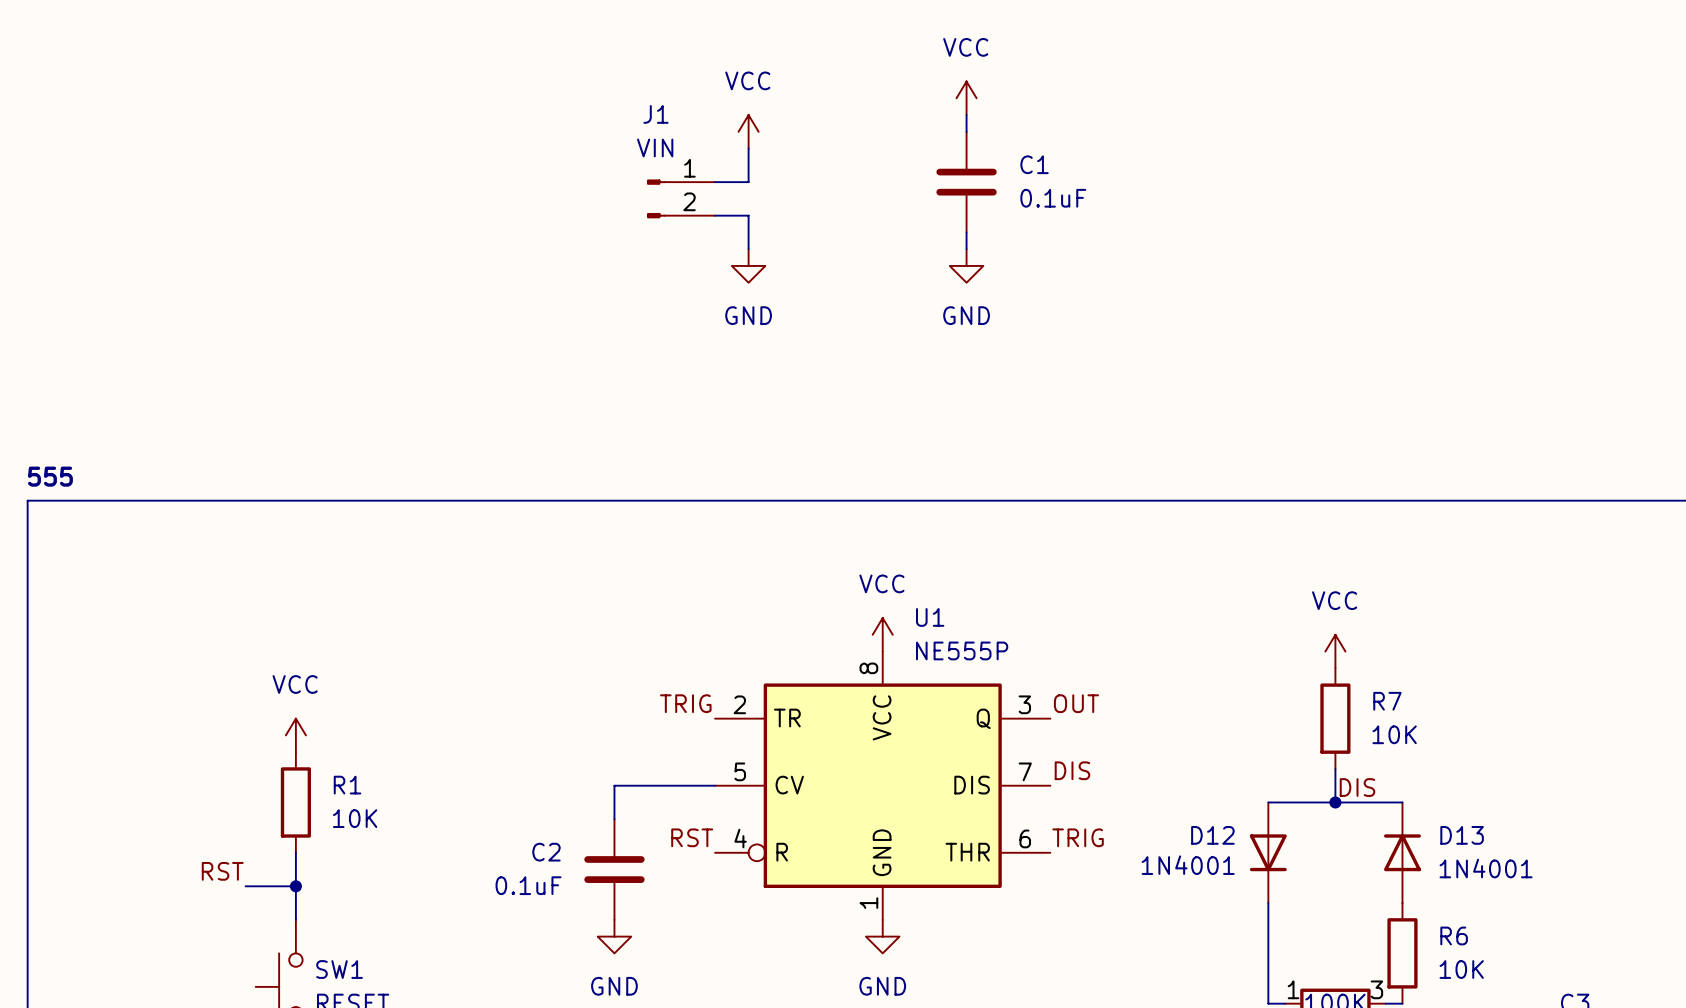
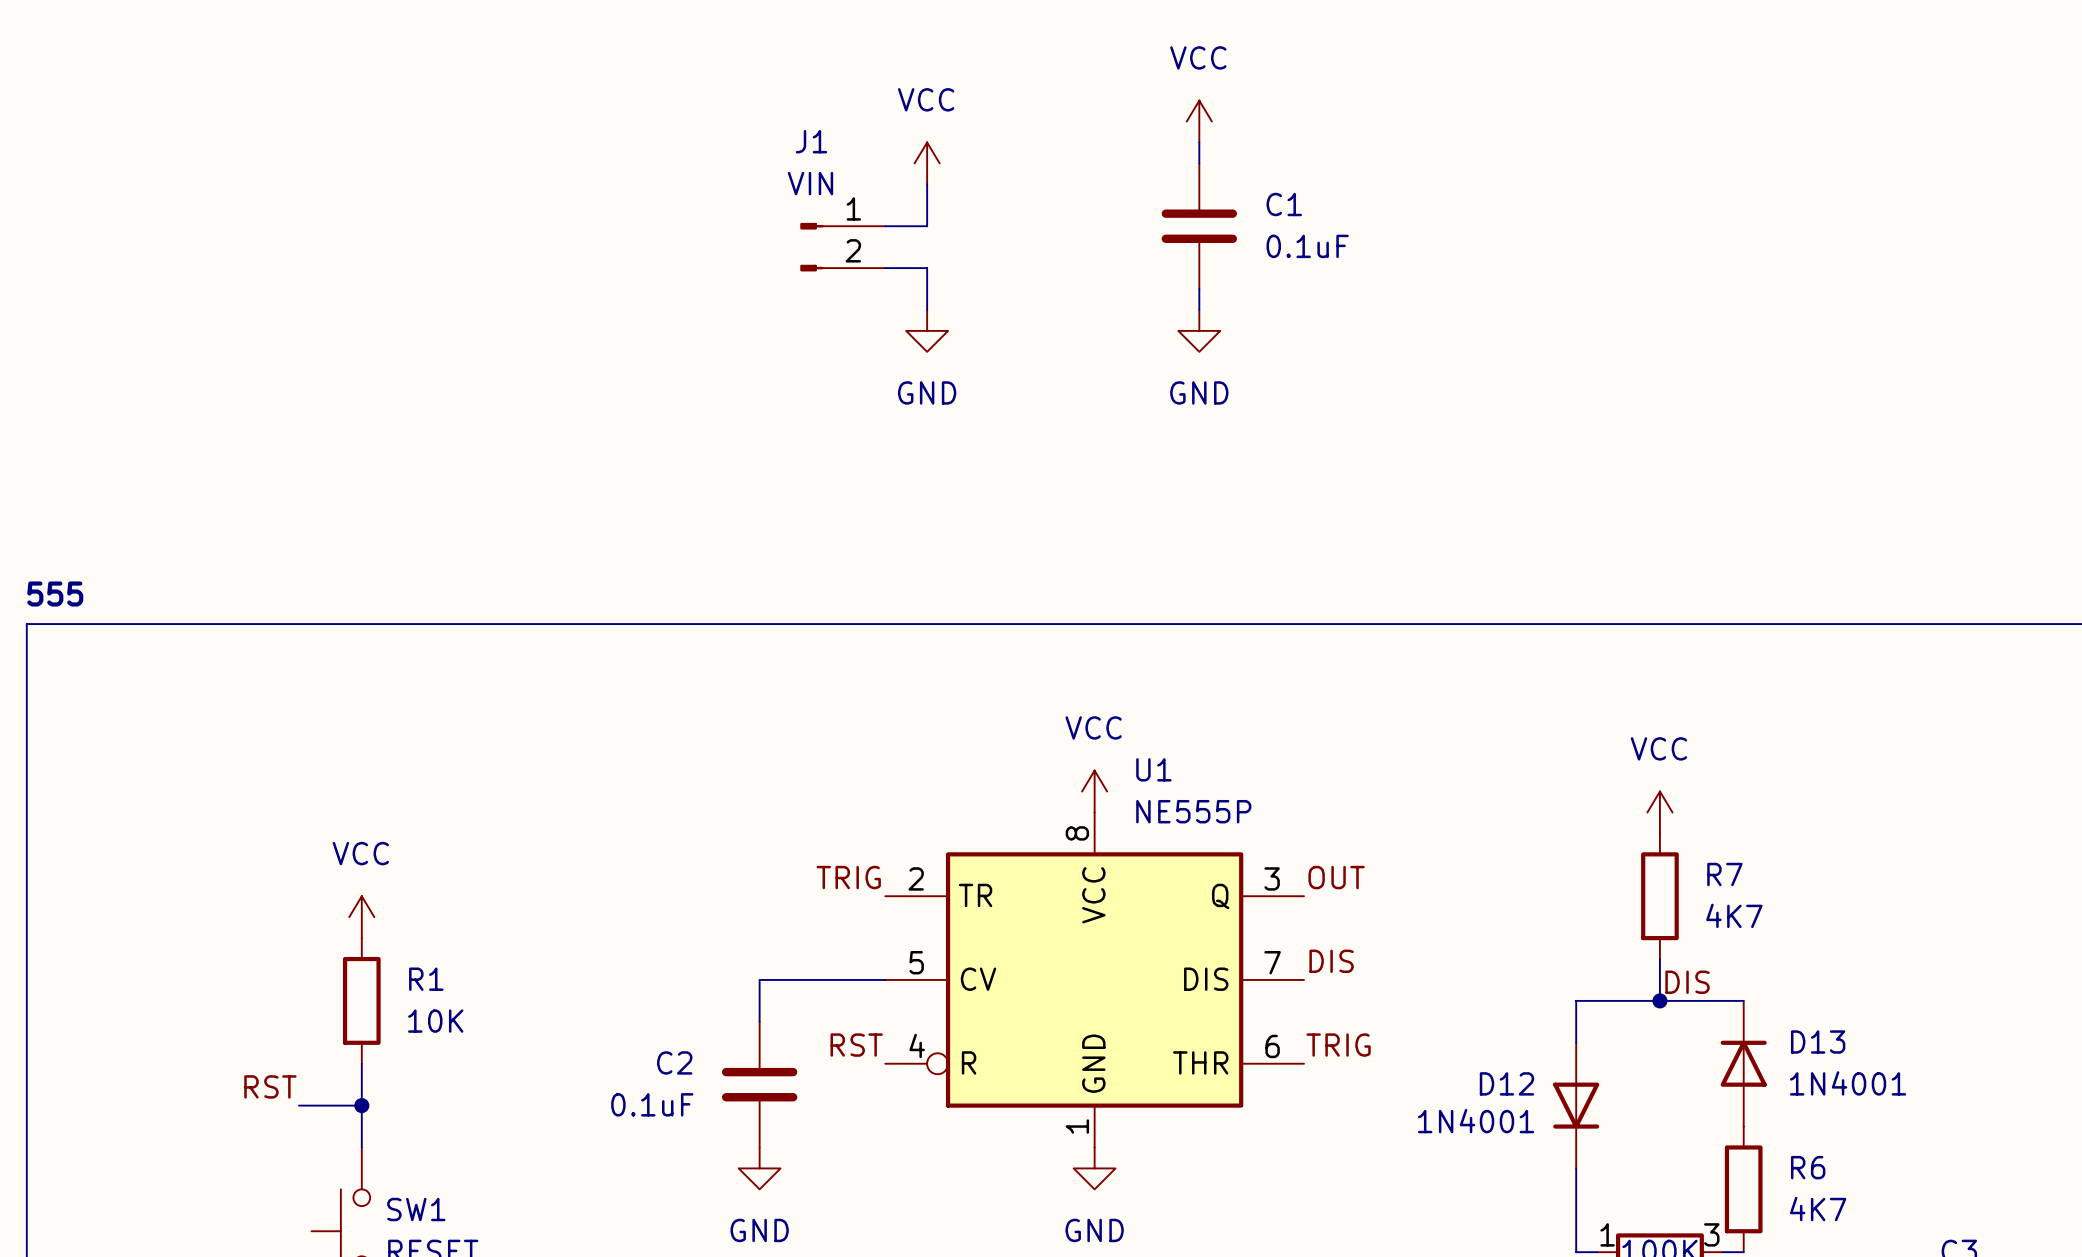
R7 value: 10K (1394, 734) -> 4K7 (1734, 915)
D12 position: (1268, 852) -> (1576, 1105)
R6 value: 10K (1461, 969) -> 4K7 (1818, 1209)

